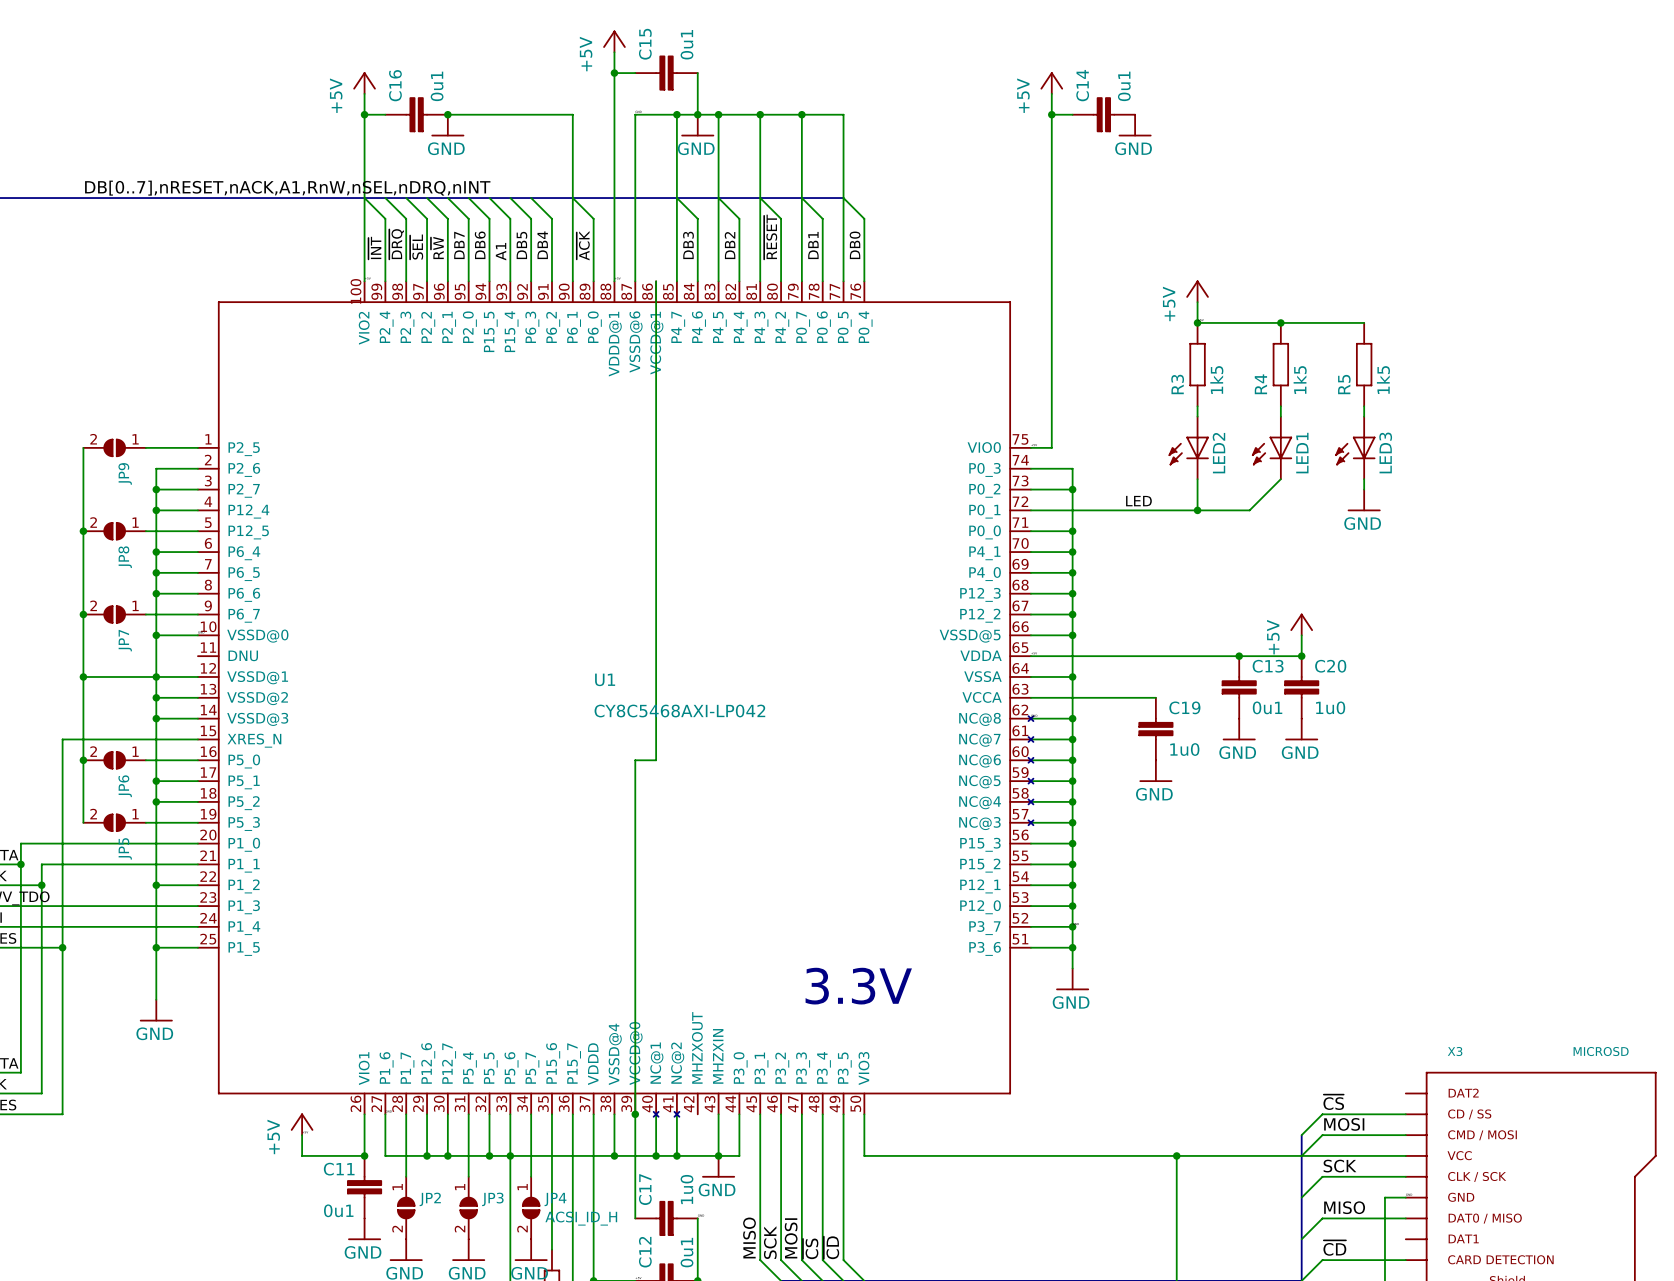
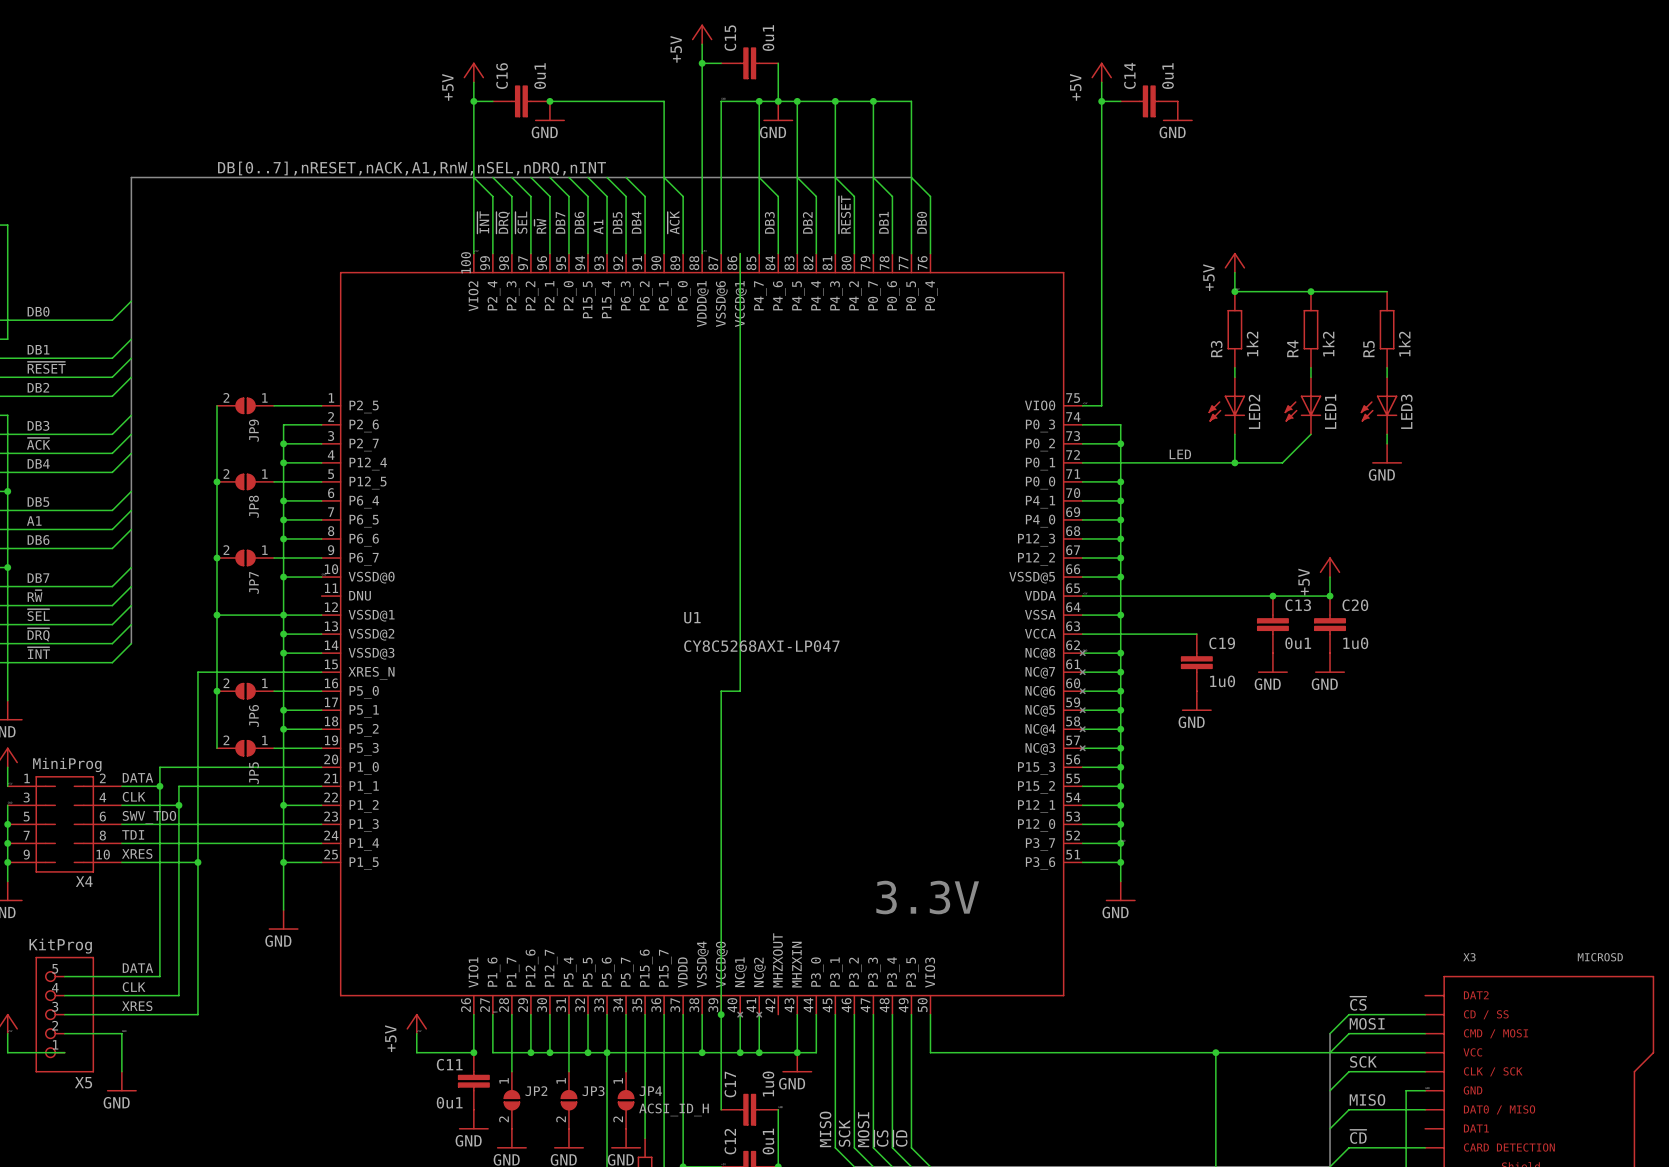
R3 value: 1k5 (1216, 380) -> 1k2 (1252, 344)
R4 value: 1k5 (1300, 380) -> 1k2 (1328, 344)
R5 value: 1k5 (1383, 380) -> 1k2 (1404, 344)
U1 value: CY8C5468AXI-LP042 (679, 711) -> CY8C5268AXI-LP047 (761, 646)

